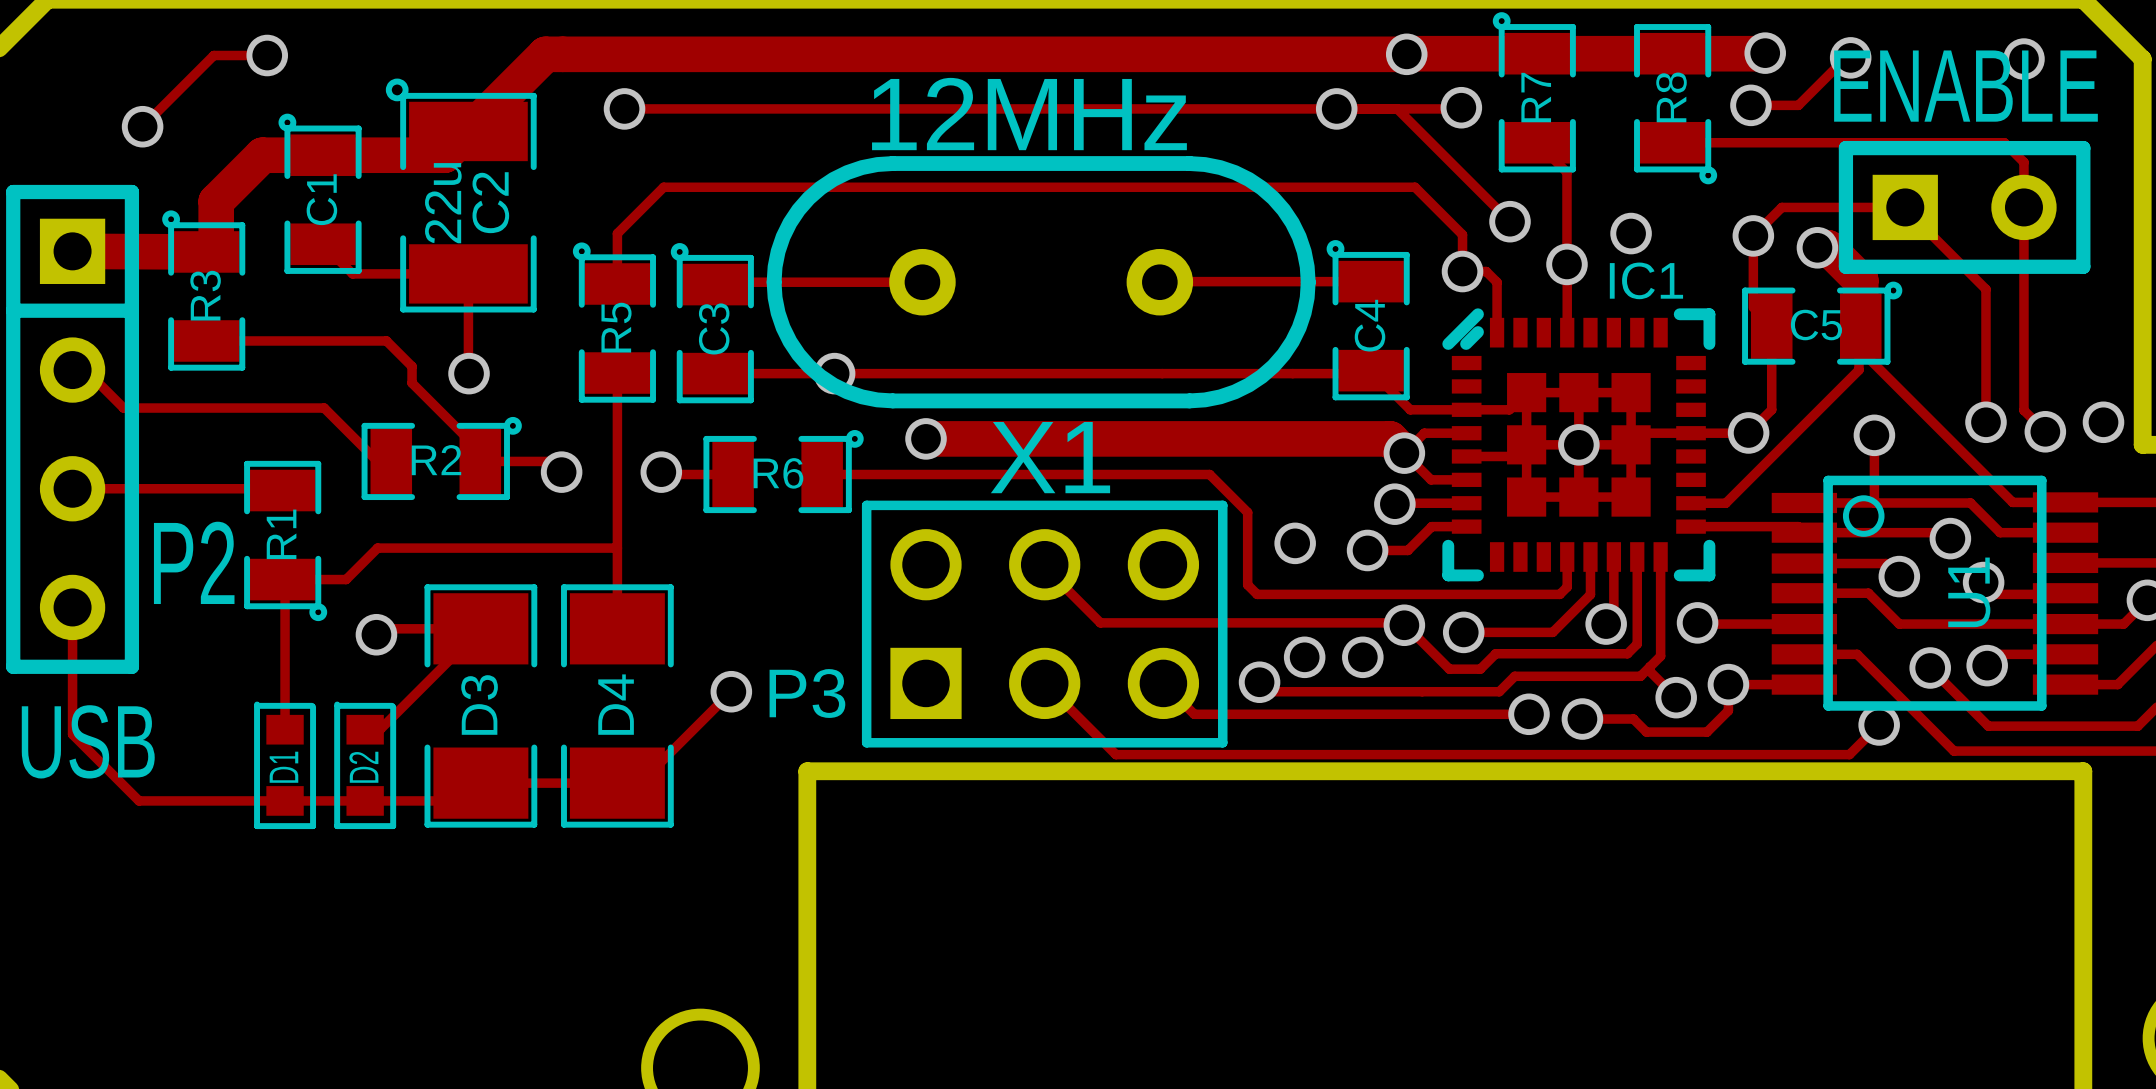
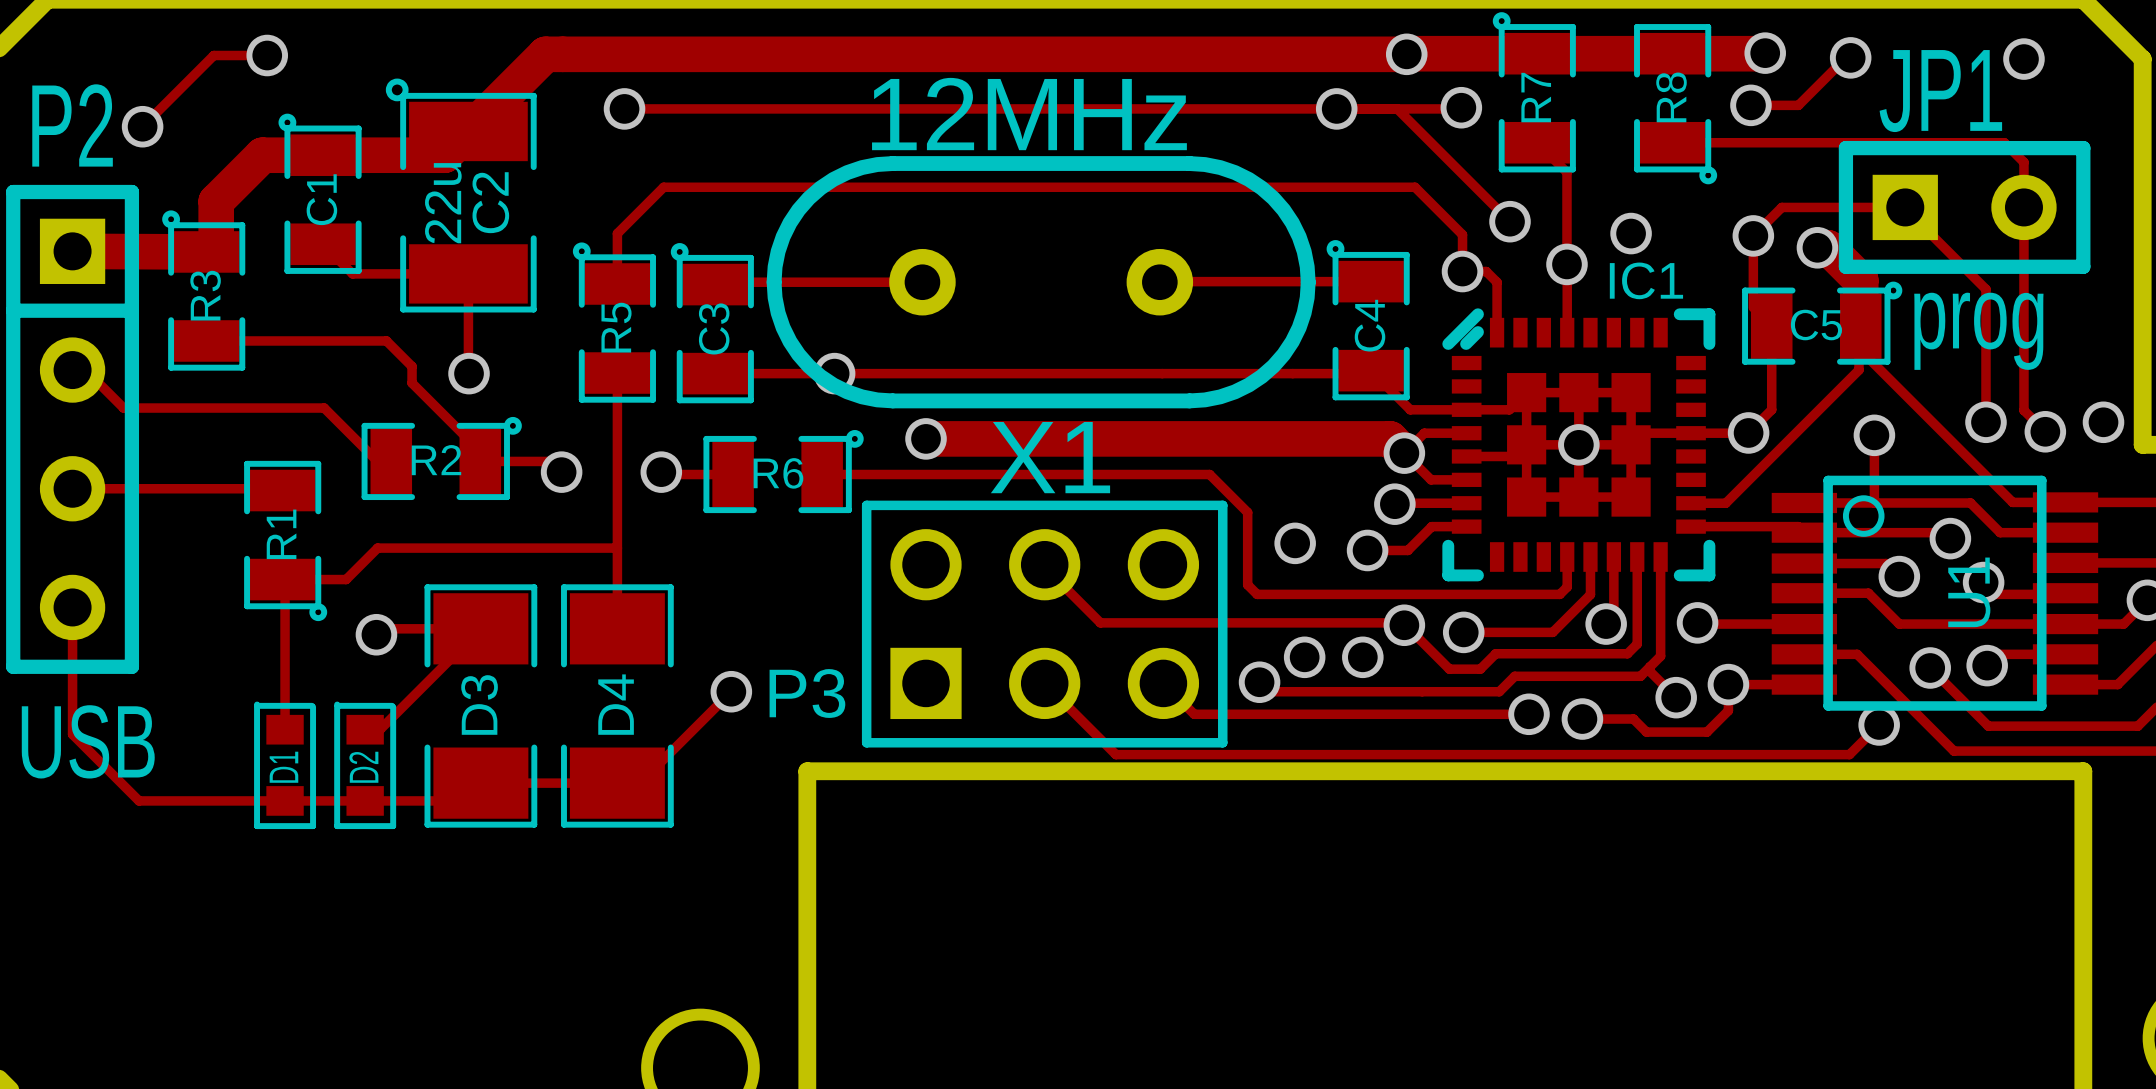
JP1 value: ENABLE (1965, 86) -> prog (1978, 331)
JP1 name: none -> JP1 (1940, 91)
P2 name position: P2 (194, 562) -> P2 (72, 125)

